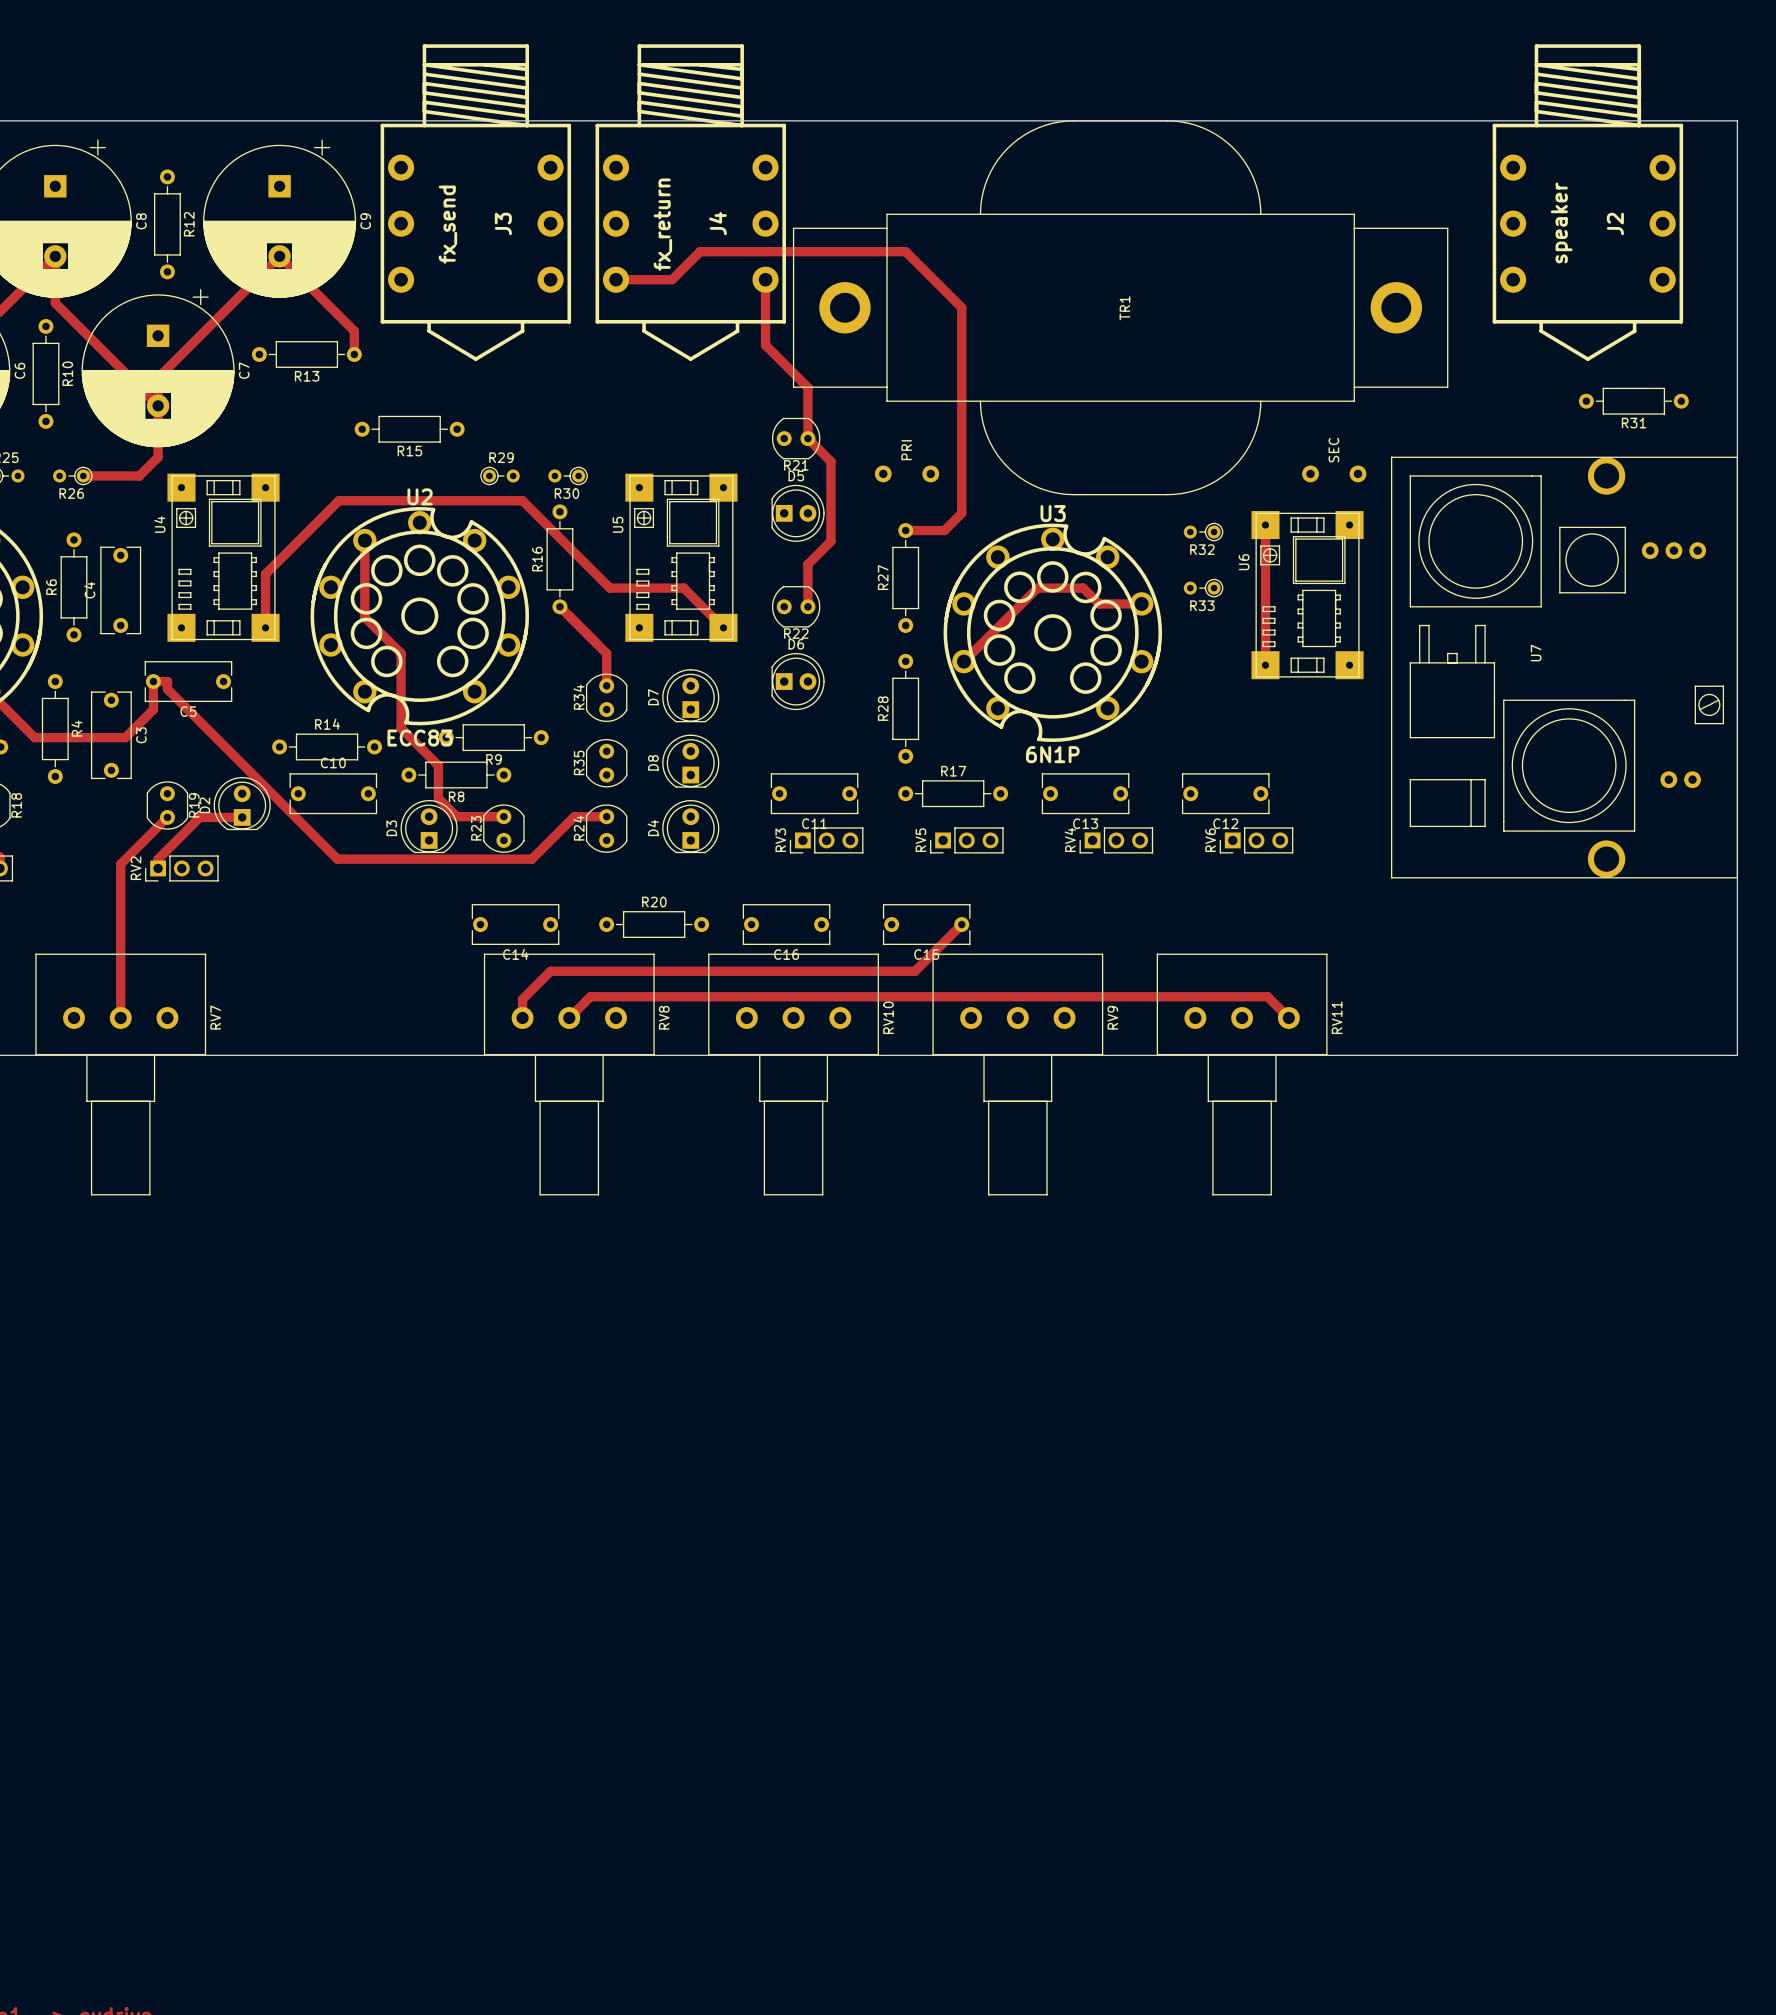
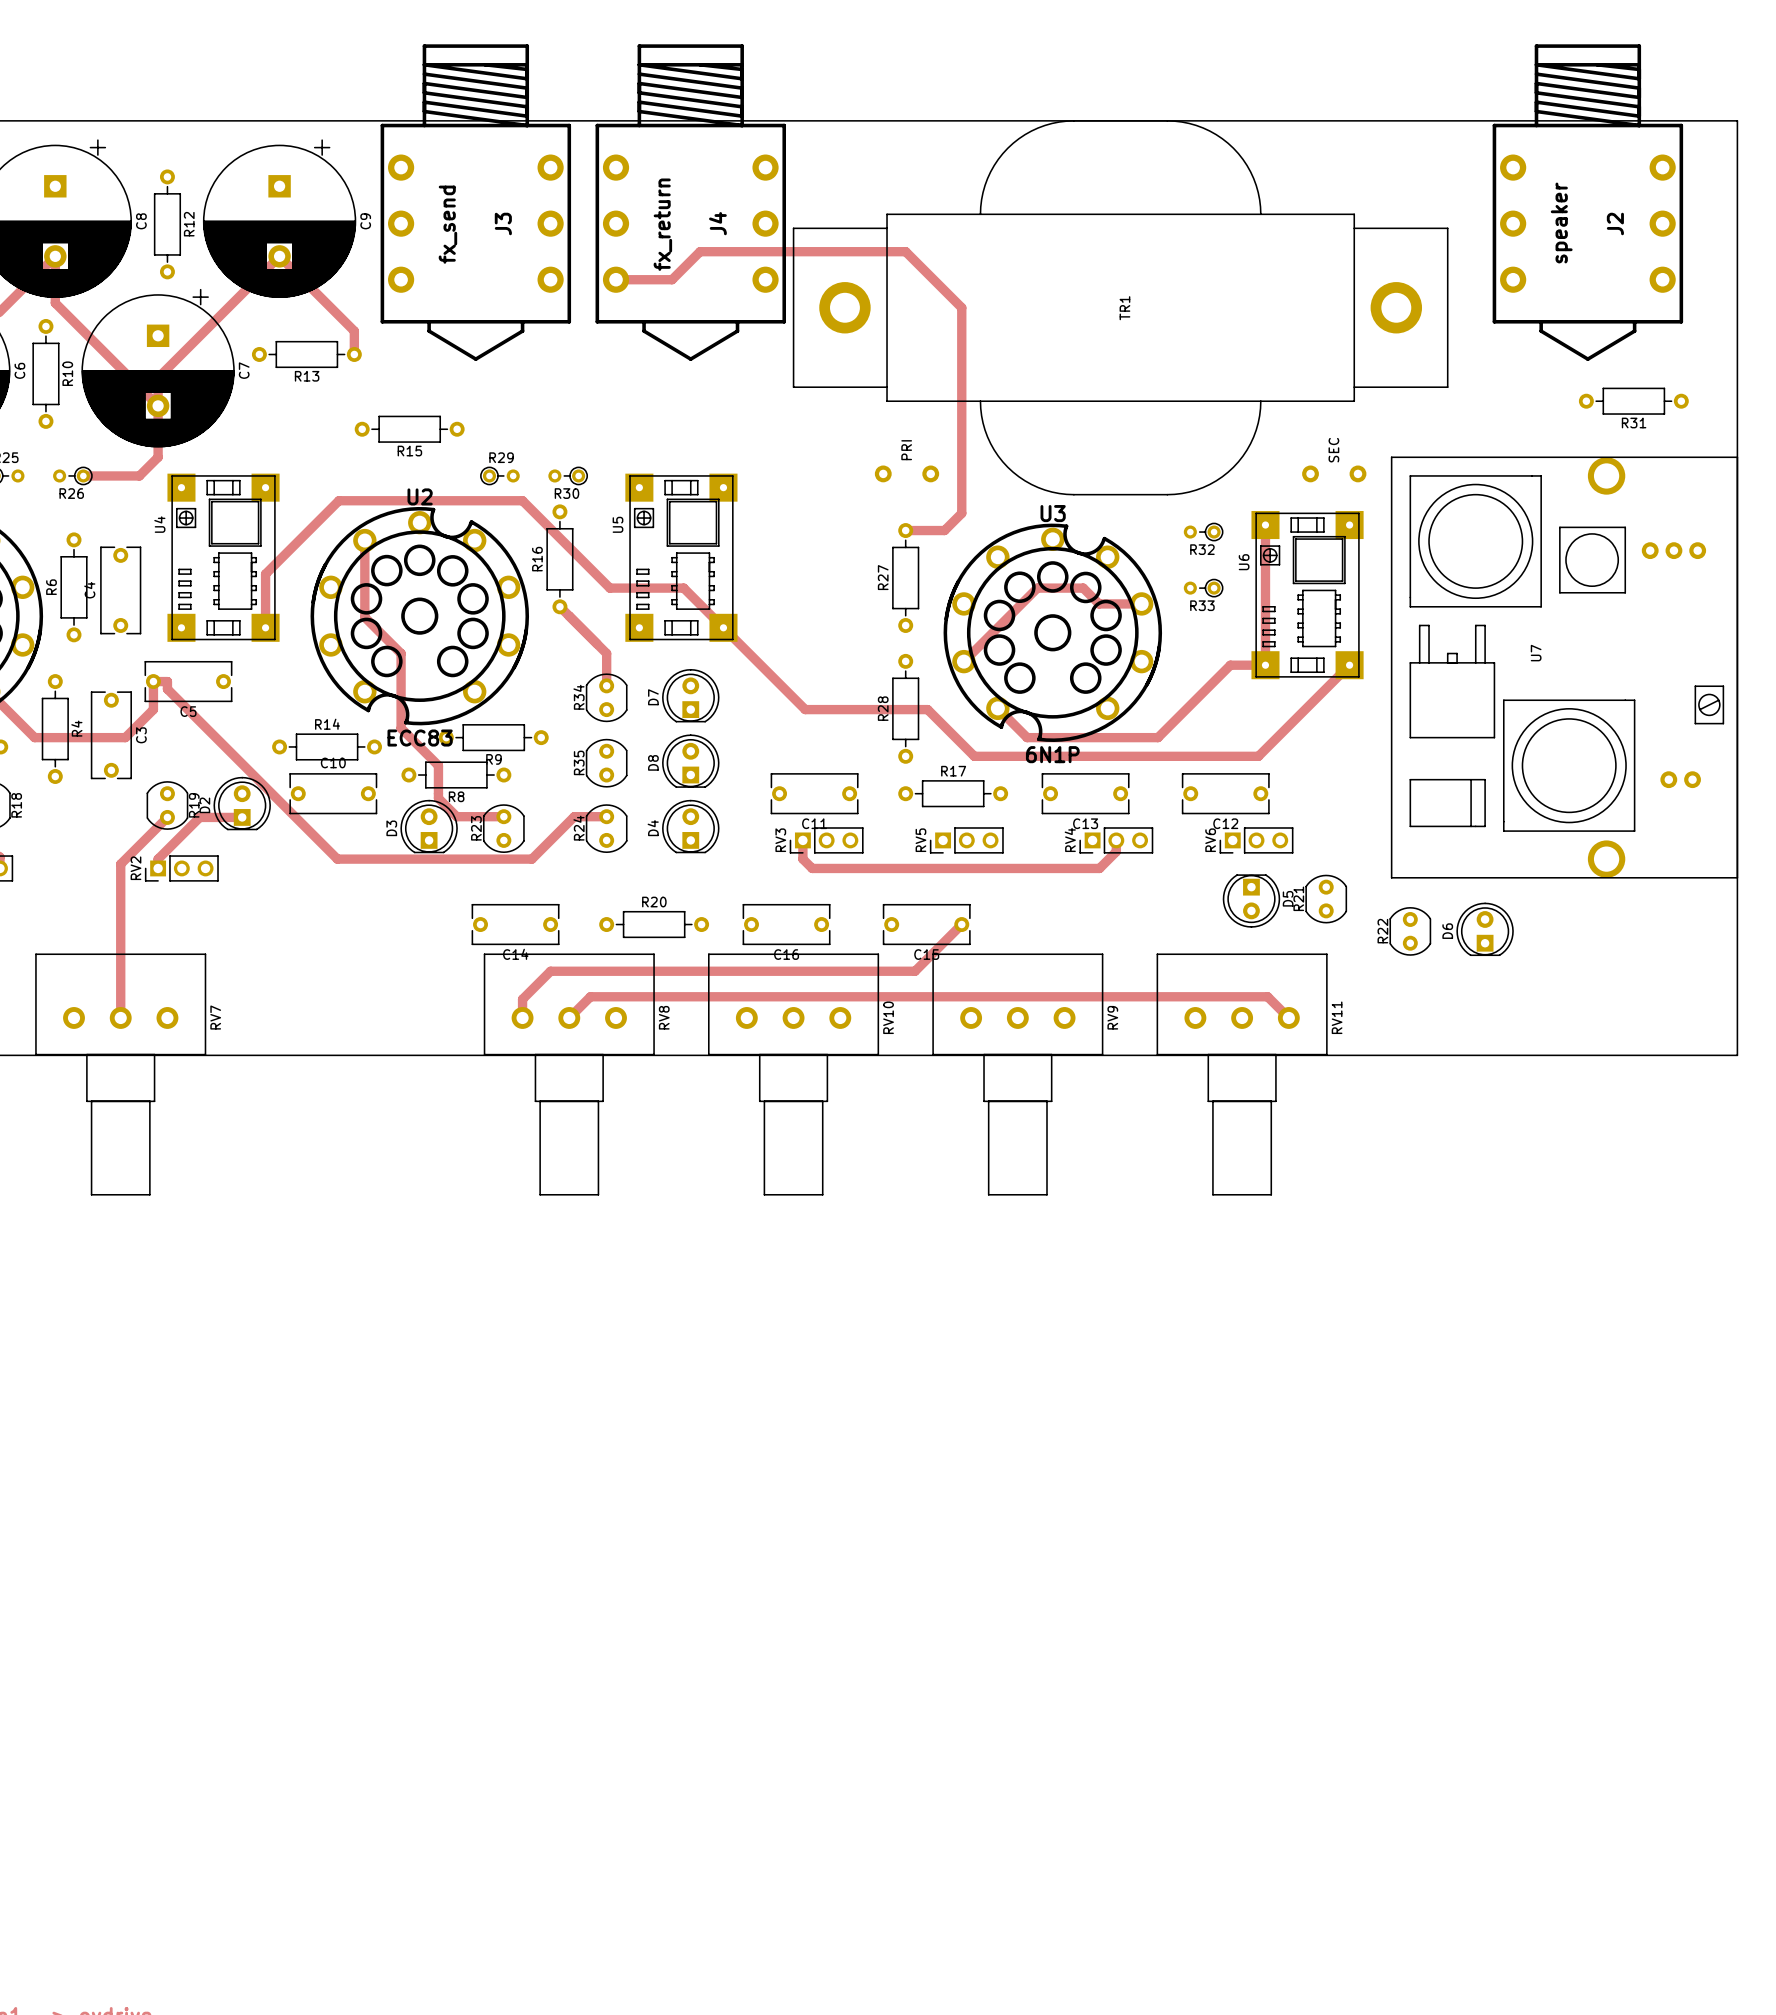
track: (765, 279) (765, 345) (807, 387) (807, 438) (830, 461) (830, 541) (807, 564) (807, 606) -> none
R21 rotation: 0° (796, 438) -> 90° clockwise (1326, 899)
R21 position: (796, 438) -> (1326, 899)
D5 rotation: 0° (798, 513) -> 90° clockwise (1251, 901)
D5 position: (798, 513) -> (1251, 901)
R22 rotation: 0° (796, 606) -> 90° clockwise (1410, 931)
R22 position: (796, 606) -> (1410, 931)
track: none -> (723, 627) (805, 709) (927, 709) (974, 756) (1258, 756) (1349, 665)
track: none -> (1265, 665) (1230, 665) (1158, 737) (1027, 737) (997, 708)
D6 rotation: 0° (798, 681) -> 90° counterclockwise (1485, 929)
D6 position: (798, 681) -> (1485, 929)
track: none -> (802, 840) (802, 859) (812, 868) (1099, 868) (1116, 851) (1116, 840)

